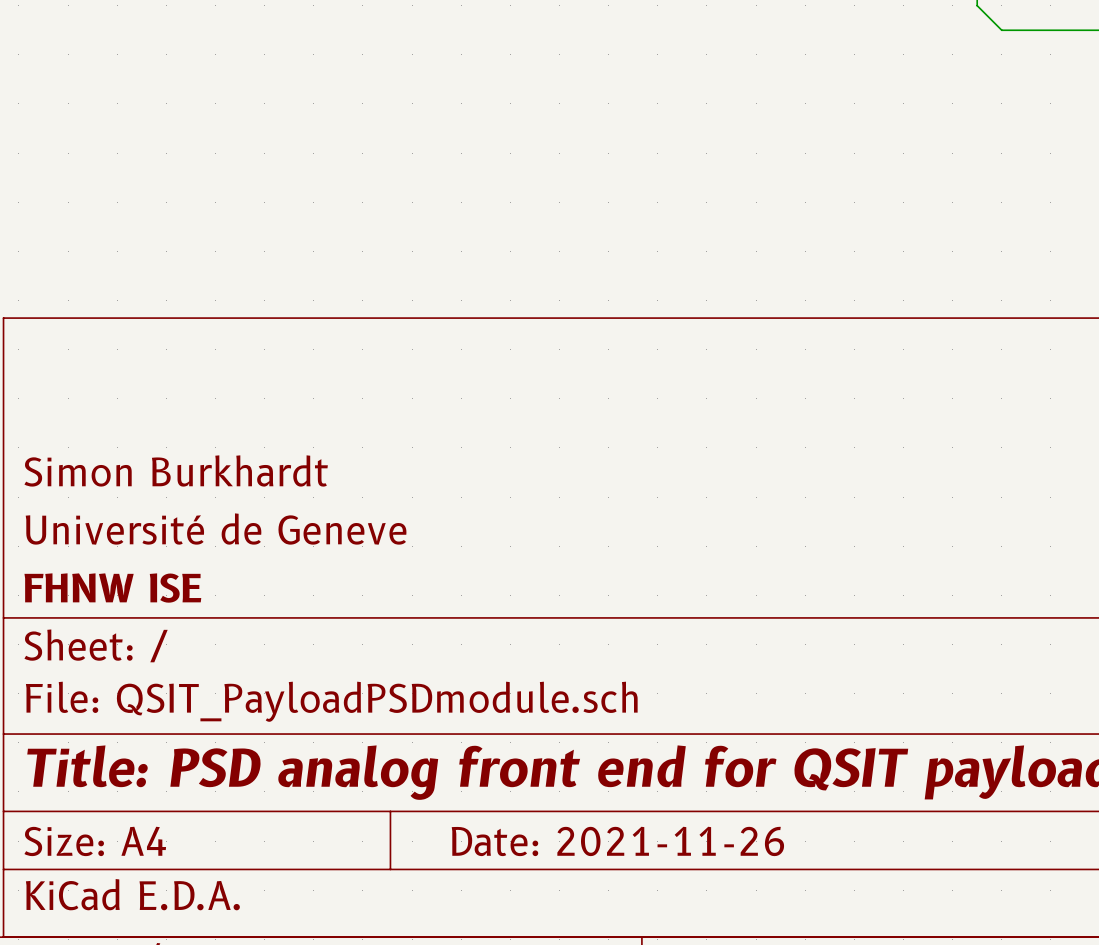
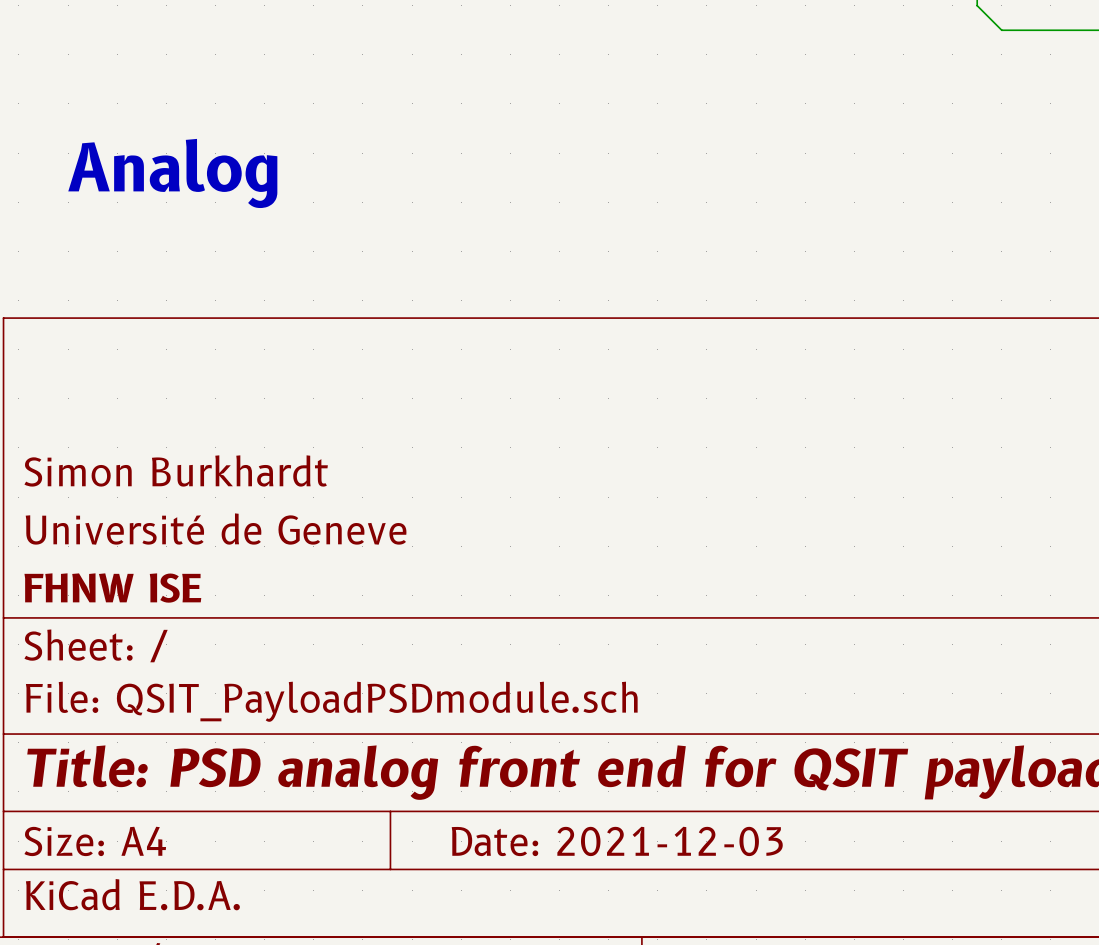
text: none -> Analog (172, 173)
title block: Date: 2021-11-26 (617, 841) -> Date: 2021-12-03 (617, 841)

